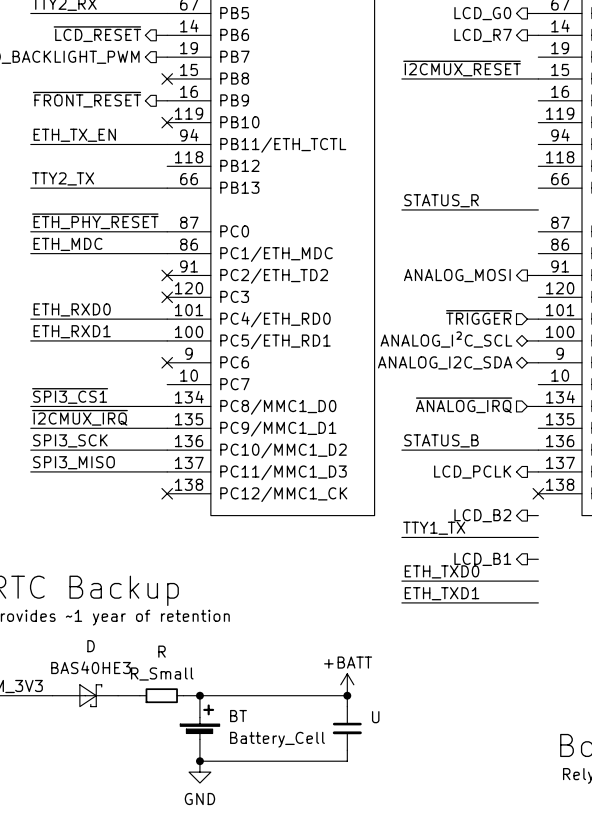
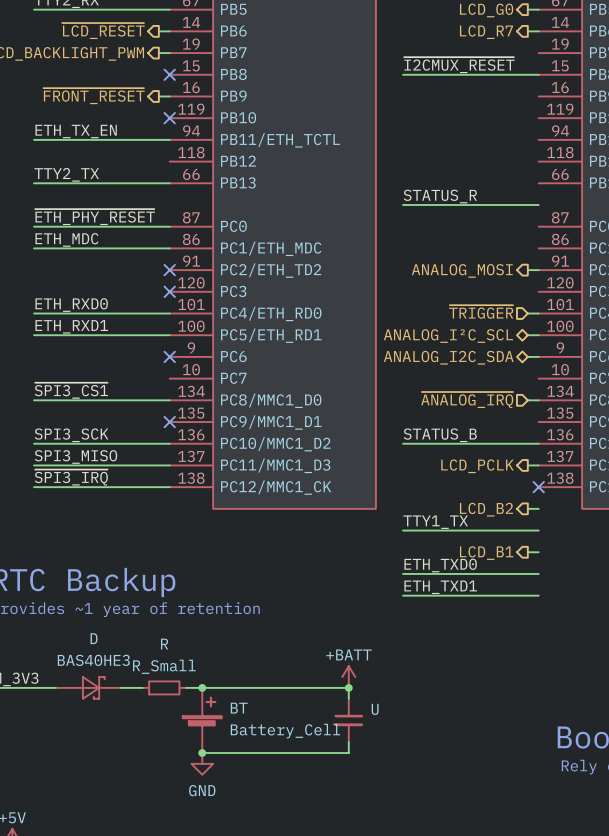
label: ~{I2CMUX_IRQ} (79, 417) -> none
wire: (30, 428) (167, 428) -> (34, 487) (169, 487)
no-connect mark: none -> (169, 422)
label: none -> ~{SPI3_IRQ} (71, 477)
no-connect mark: (167, 493) -> none

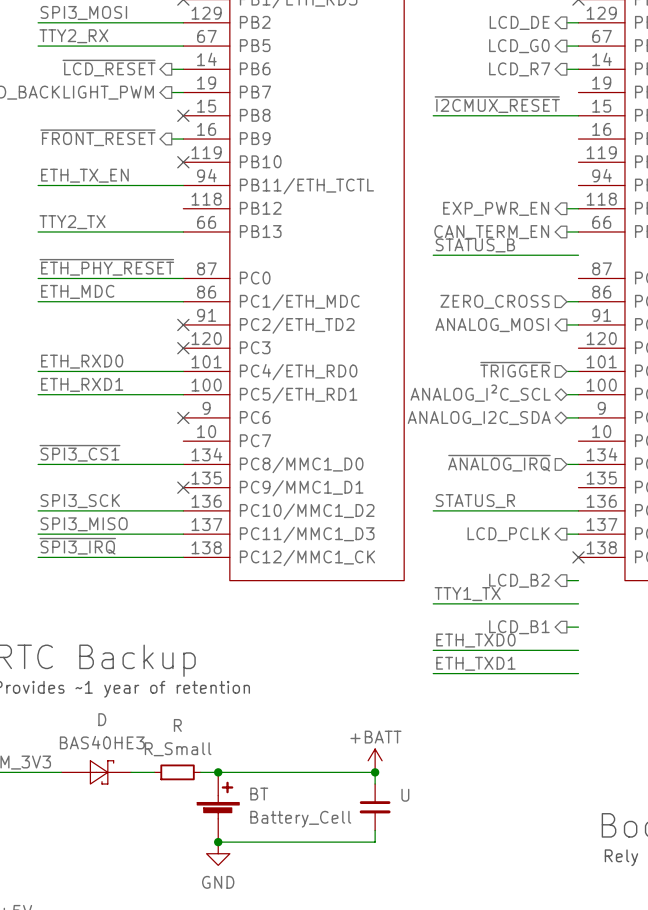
wire: none -> (566, 208) (578, 208)
hierarchical label: none -> EXP_PWR_EN (496, 208)
wire: none -> (566, 231) (578, 231)
hierarchical label: none -> CAN_TERM_EN (491, 232)
label: STATUS_R (440, 196) -> STATUS_B (475, 245)
wire: none -> (566, 301) (578, 301)
hierarchical label: none -> ZERO_CROSS (495, 301)
label: STATUS_B (440, 435) -> STATUS_R (475, 501)

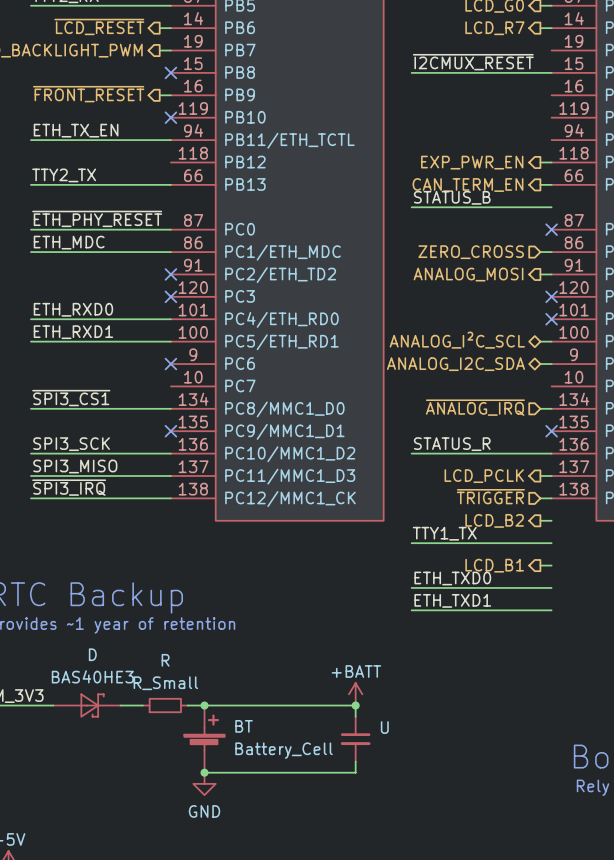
no-connect mark: none -> (551, 229)
no-connect mark: none -> (551, 296)
hierarchical label position: ~{TRIGGER} (515, 369) -> ~{TRIGGER} (490, 496)
wire: (566, 371) (578, 371) -> (540, 498) (551, 498)
no-connect mark: none -> (551, 319)
no-connect mark: none -> (551, 431)
no-connect mark: (578, 557) -> none

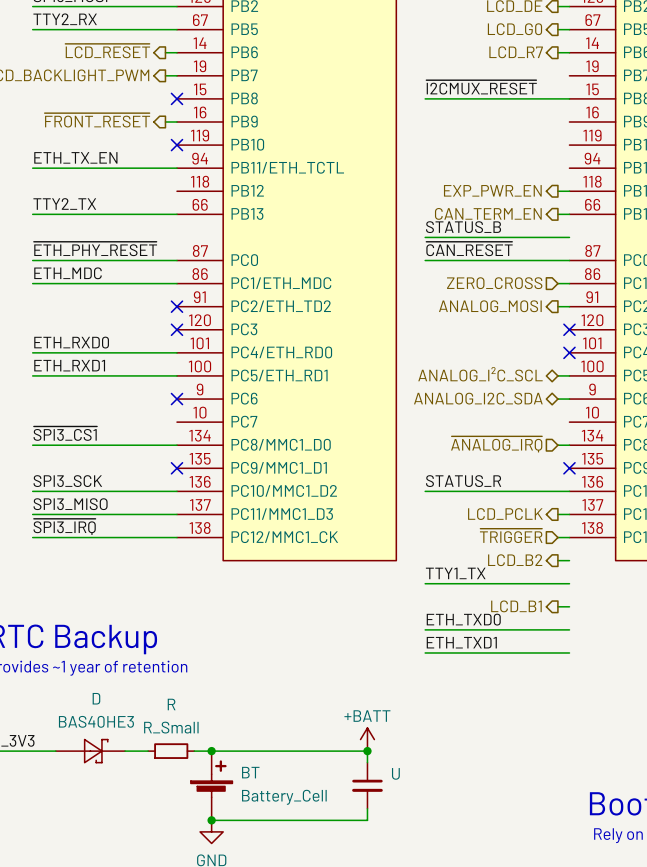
label: none -> ~{CAN_RESET} (469, 248)
wire: none -> (425, 260) (569, 260)
no-connect mark: (551, 229) -> none

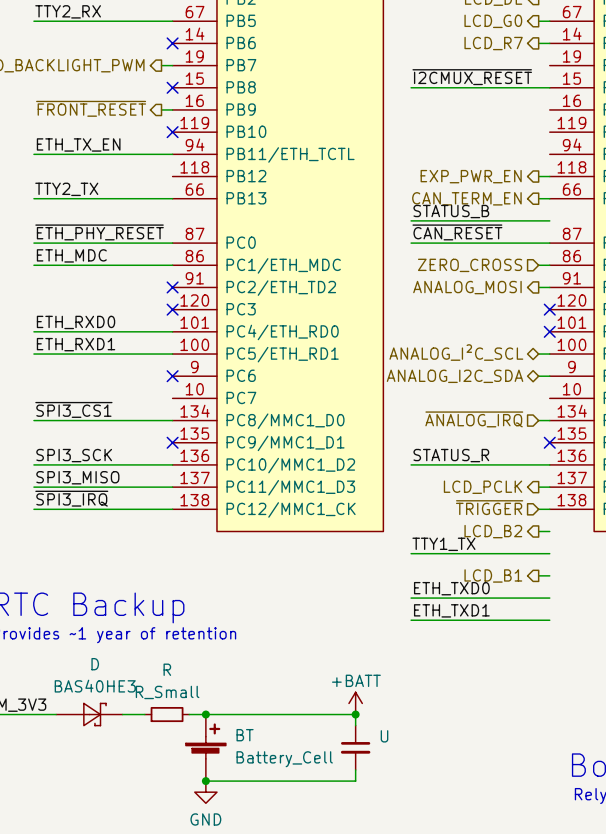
hierarchical label: ~{LCD_RESET} (107, 51) -> none
wire: (165, 52) (176, 52) -> none
no-connect mark: none -> (172, 43)

